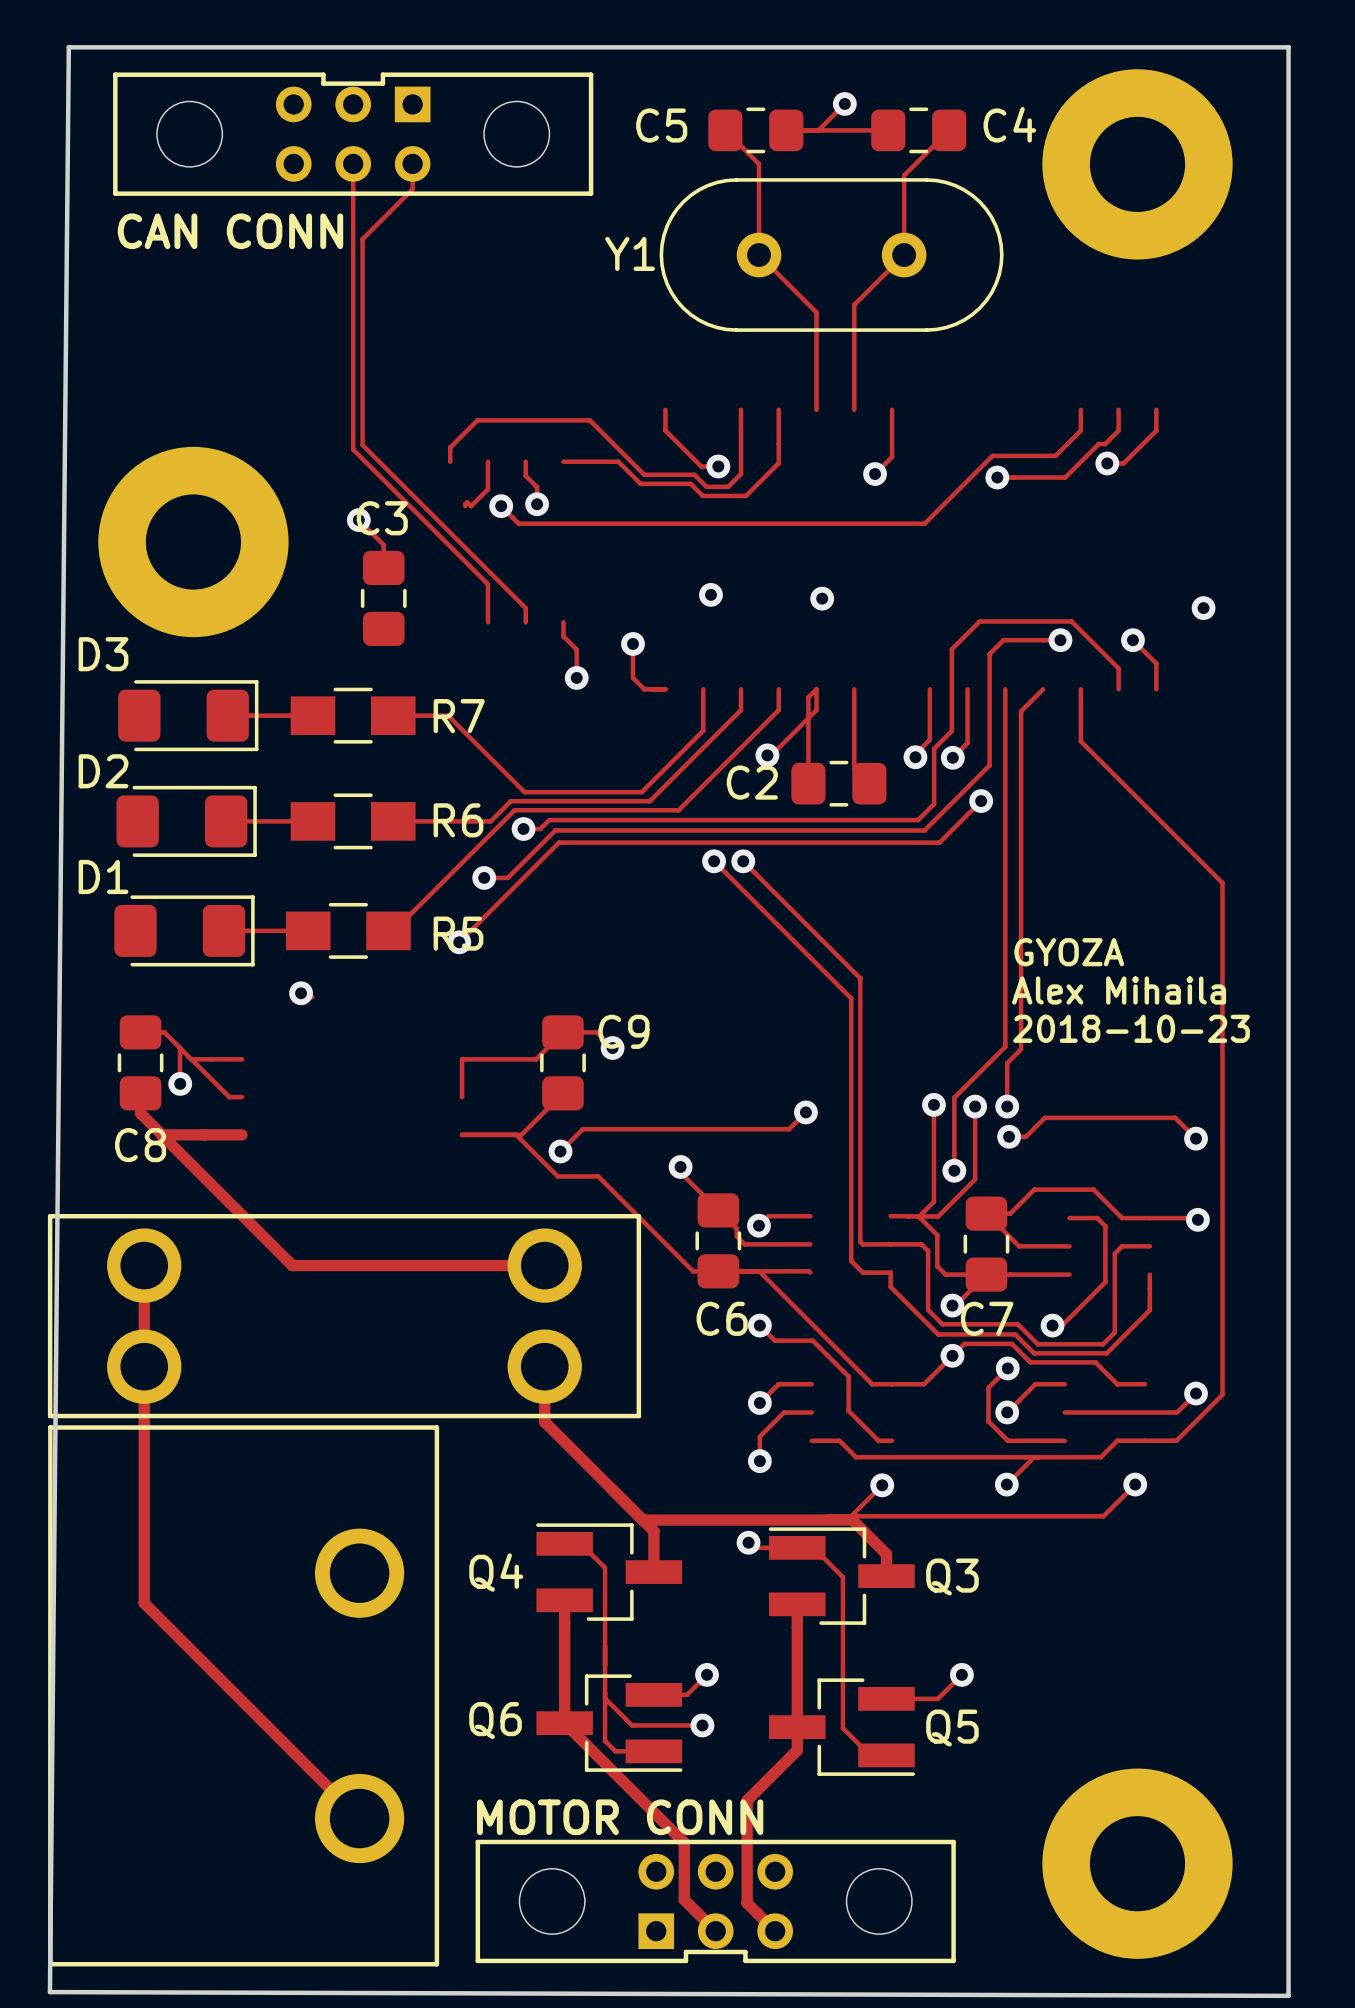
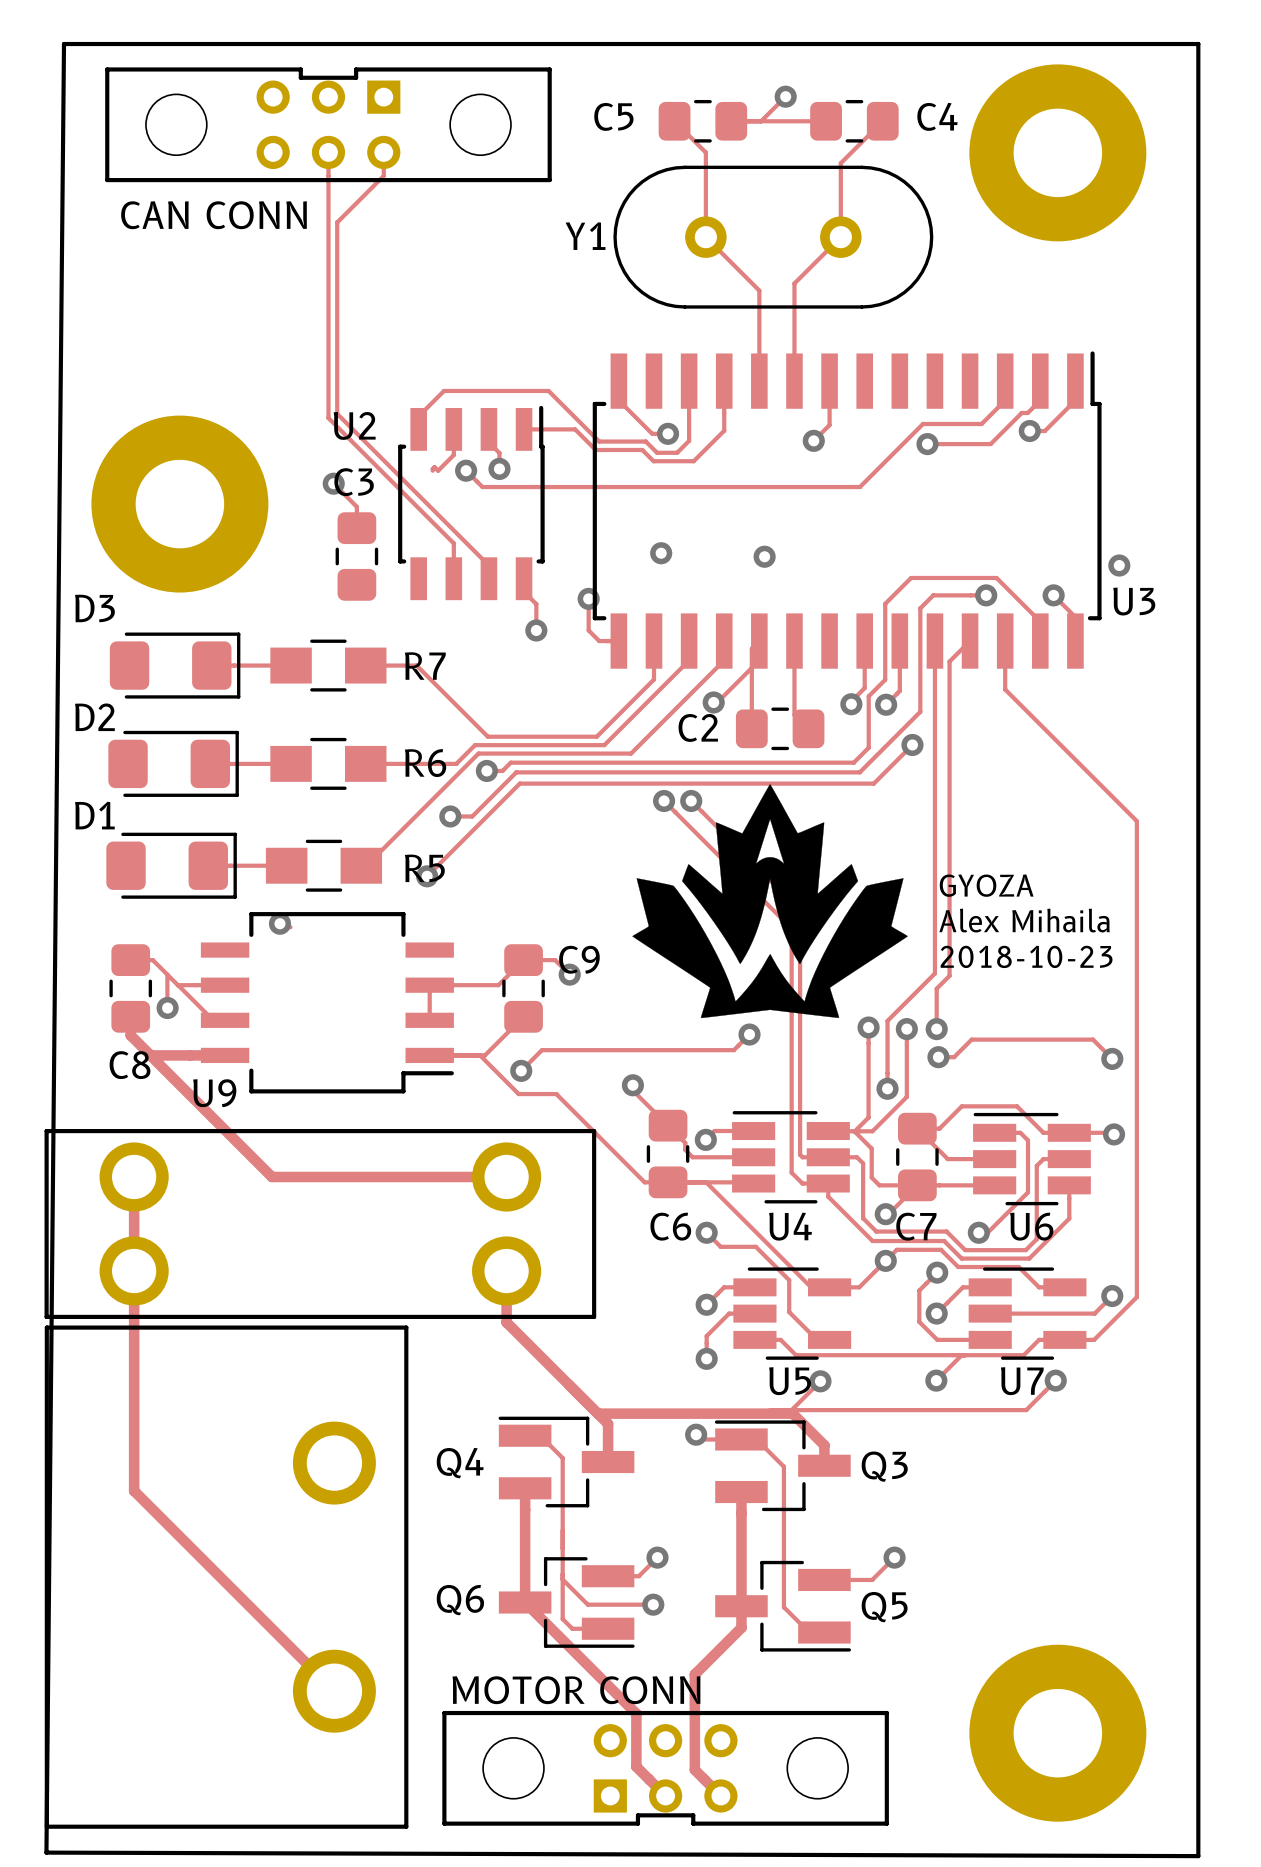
U2: none -> (471, 503)
U3: none -> (847, 510)
drawing: none -> [632, 784, 908, 1019]
U9: none -> (327, 1002)
U4: none -> (790, 1157)
U6: none -> (1031, 1159)
U5: none -> (792, 1313)
U7: none -> (1027, 1313)

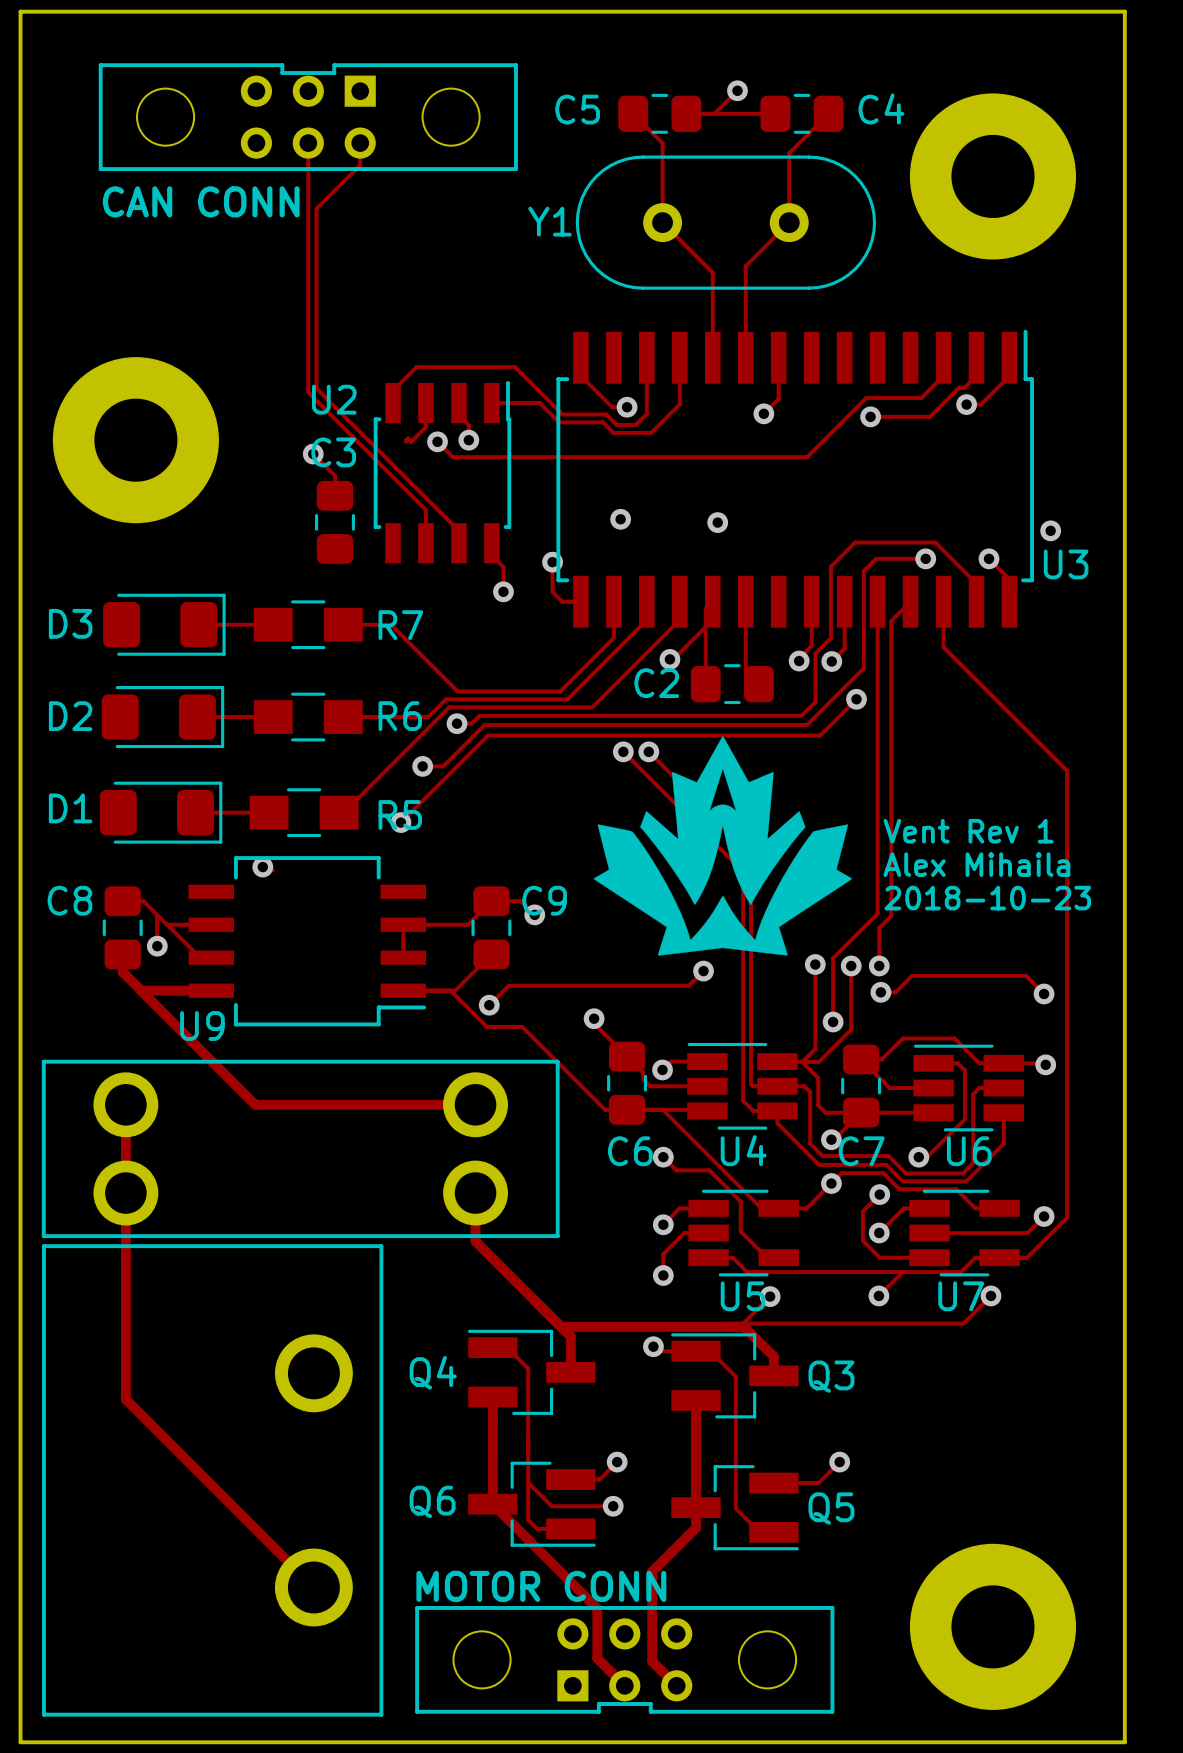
board edge: (1198, 44) (64, 44) (46, 1852) (1198, 1856) -> (1124, 41) (1124, 11) (20, 11) (20, 1742) (1124, 1742)
part position: (1057, 152) -> (992, 176)
part position: (179, 504) -> (135, 440)
D3 name position: D3 (94, 608) -> D3 (70, 623)
D2 name position: D2 (94, 717) -> D2 (70, 716)
D1 name position: D1 (94, 815) -> D1 (70, 808)
text: GYOZA (986, 885) -> Vent Rev 1 (968, 831)
C8 name position: C8 (130, 1065) -> C8 (69, 900)

